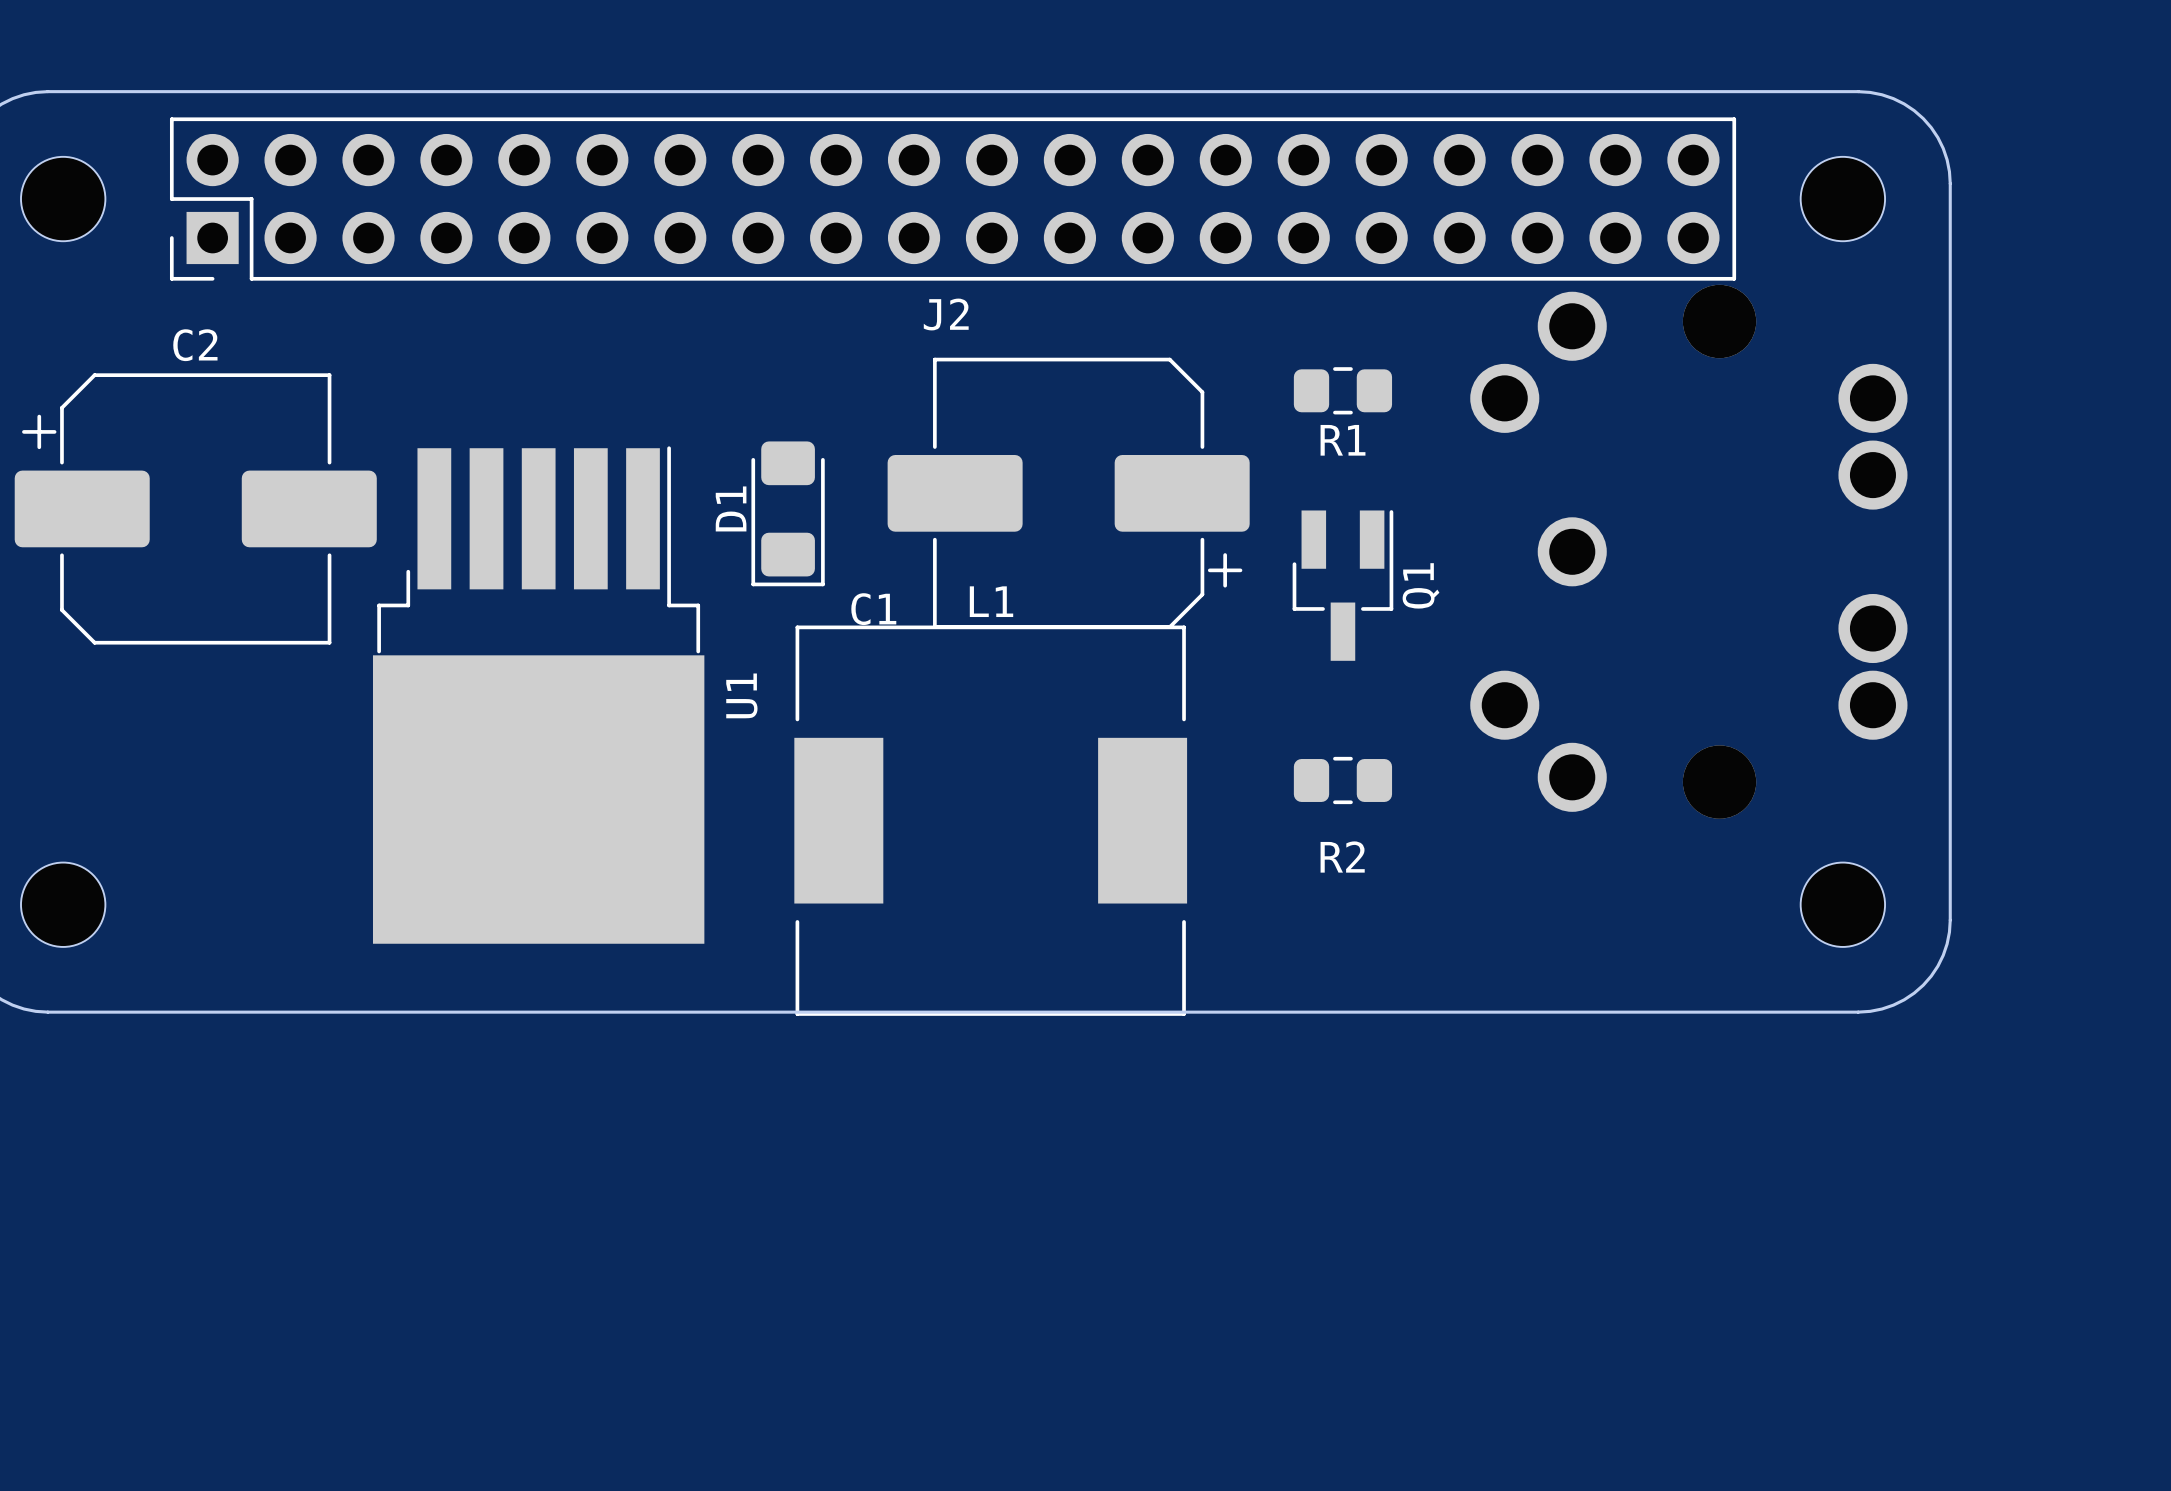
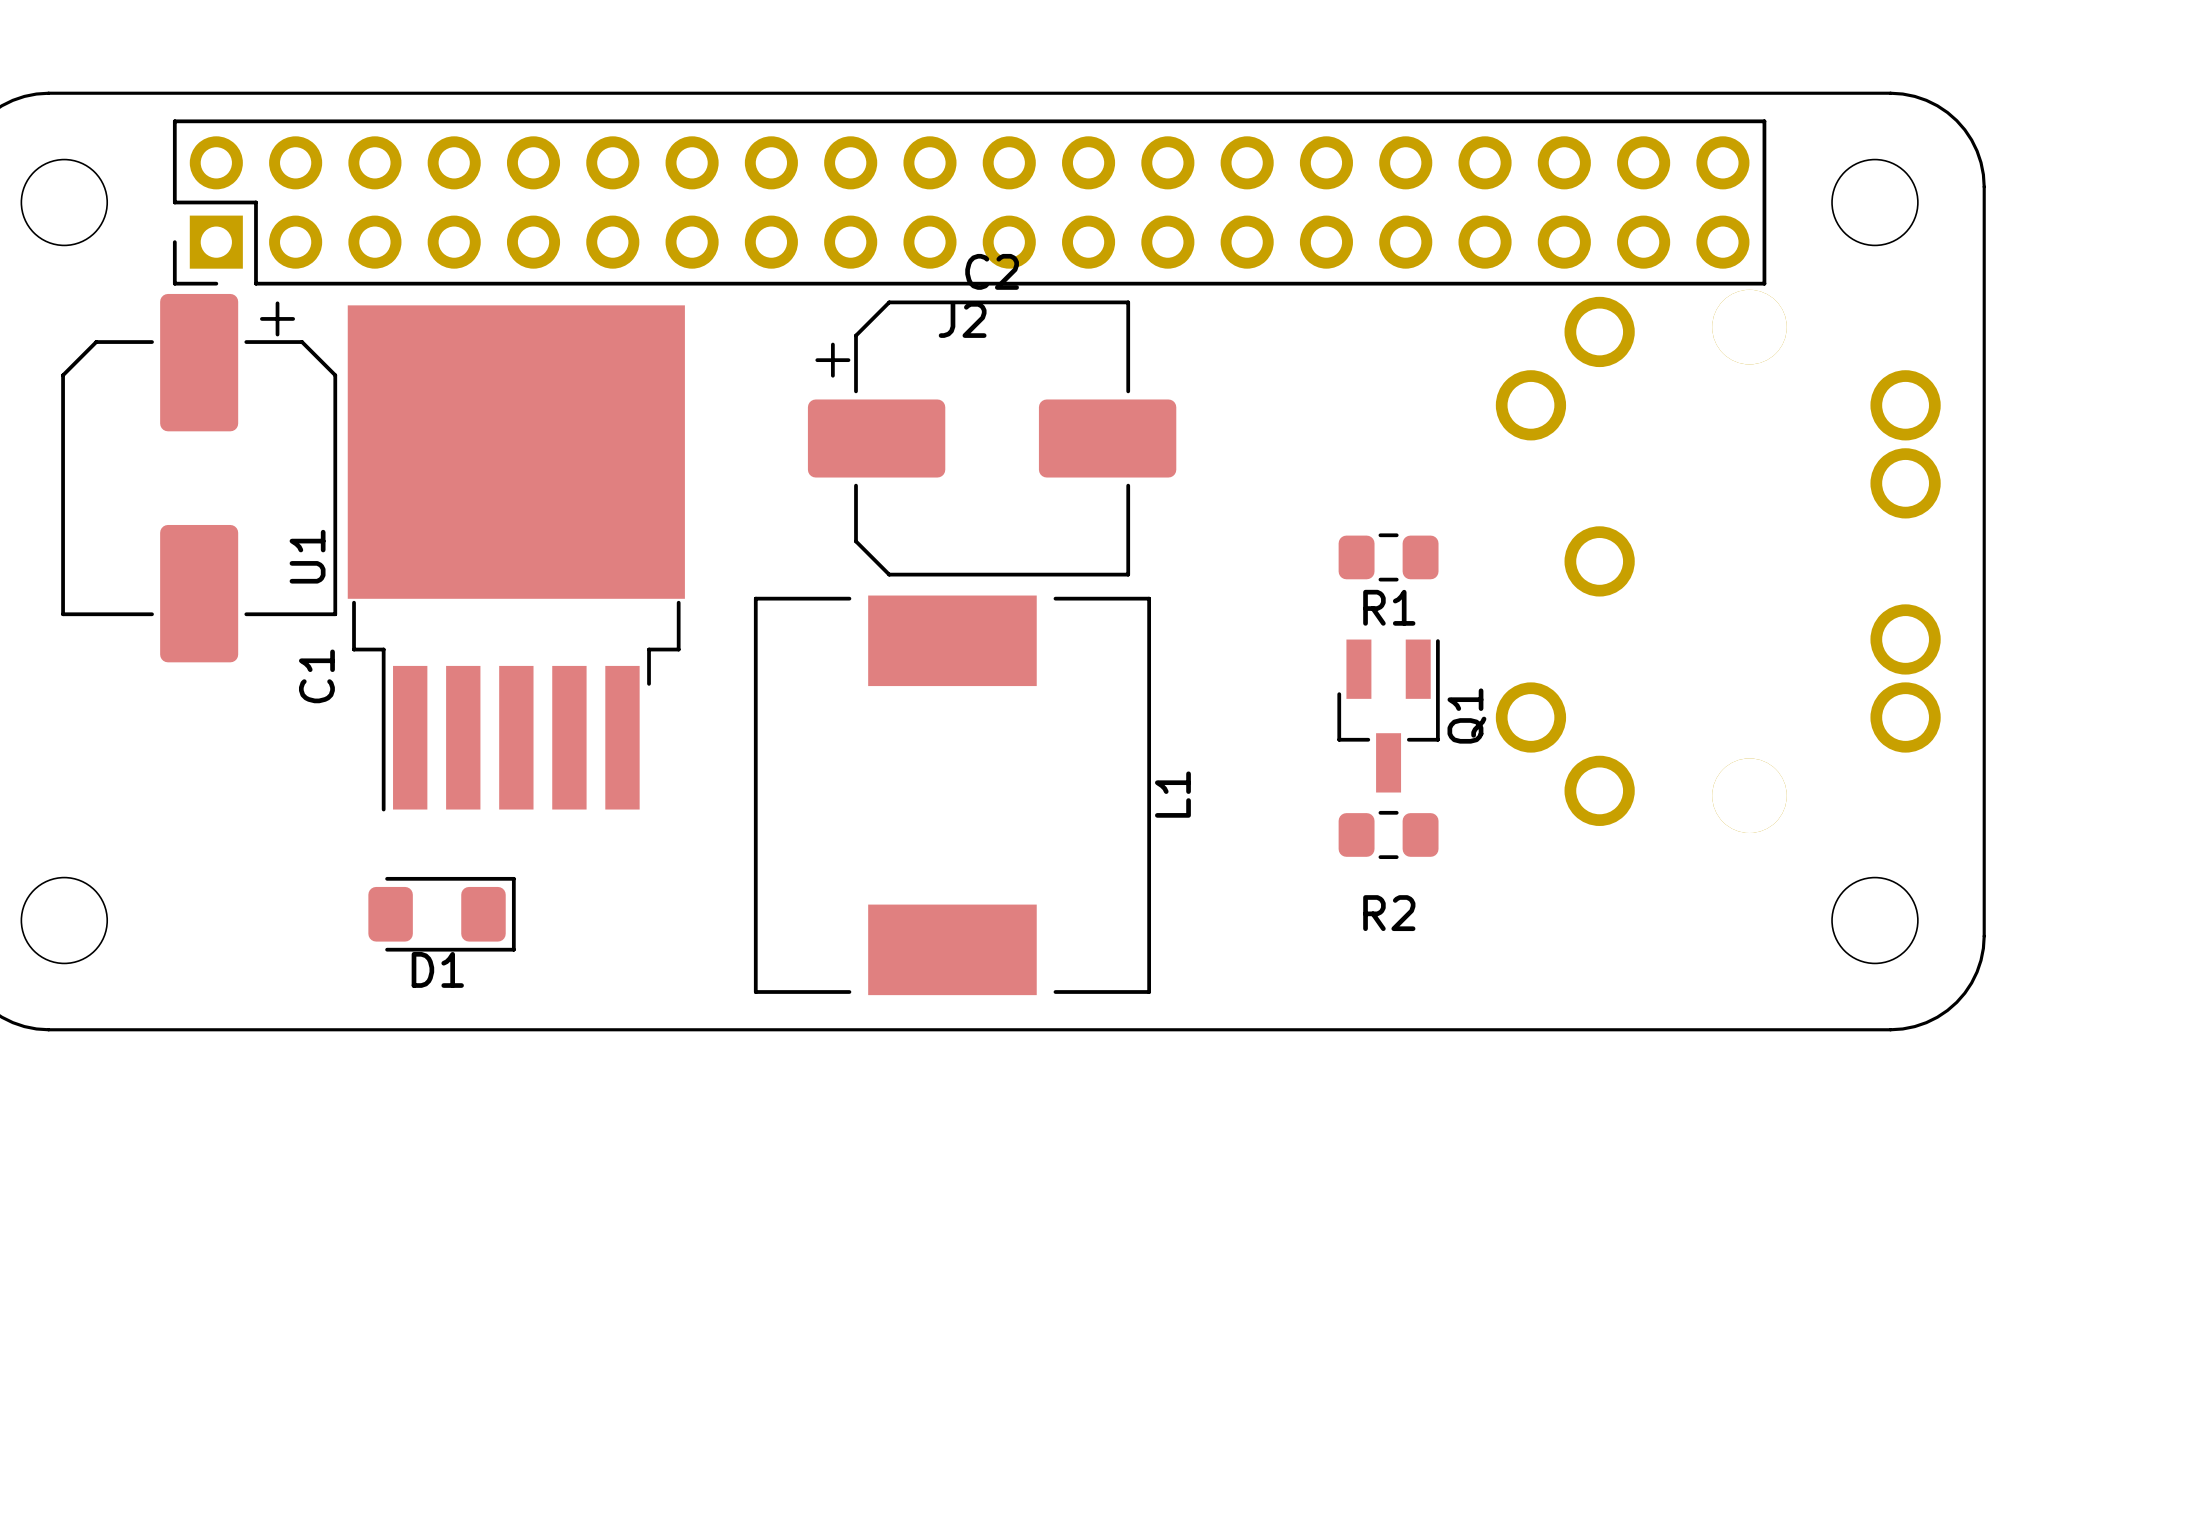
R1 position: (1342, 390) -> (1388, 557)
C1 rotation: 0° (1068, 493) -> 90° counterclockwise (199, 478)
C1 position: (1068, 493) -> (199, 478)
C2 position: (195, 508) -> (992, 438)
D1 rotation: 0° (788, 513) -> 90° counterclockwise (442, 914)
D1 position: (788, 513) -> (442, 914)
Q1 position: (1342, 585) -> (1388, 715)
U1 rotation: 0° (538, 695) -> 180° (516, 558)
R2 position: (1342, 780) -> (1388, 834)
L1 rotation: 0° (990, 820) -> 90° clockwise (952, 795)

